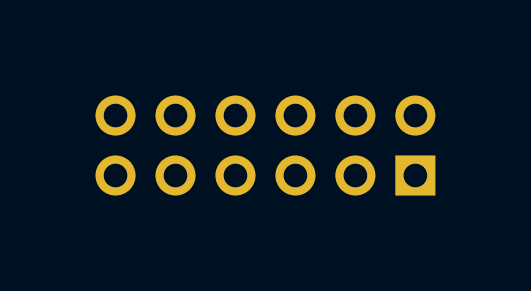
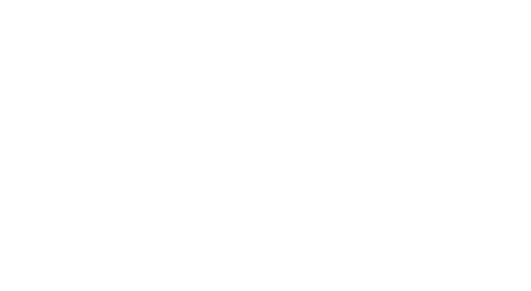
part: (265, 145) -> none

